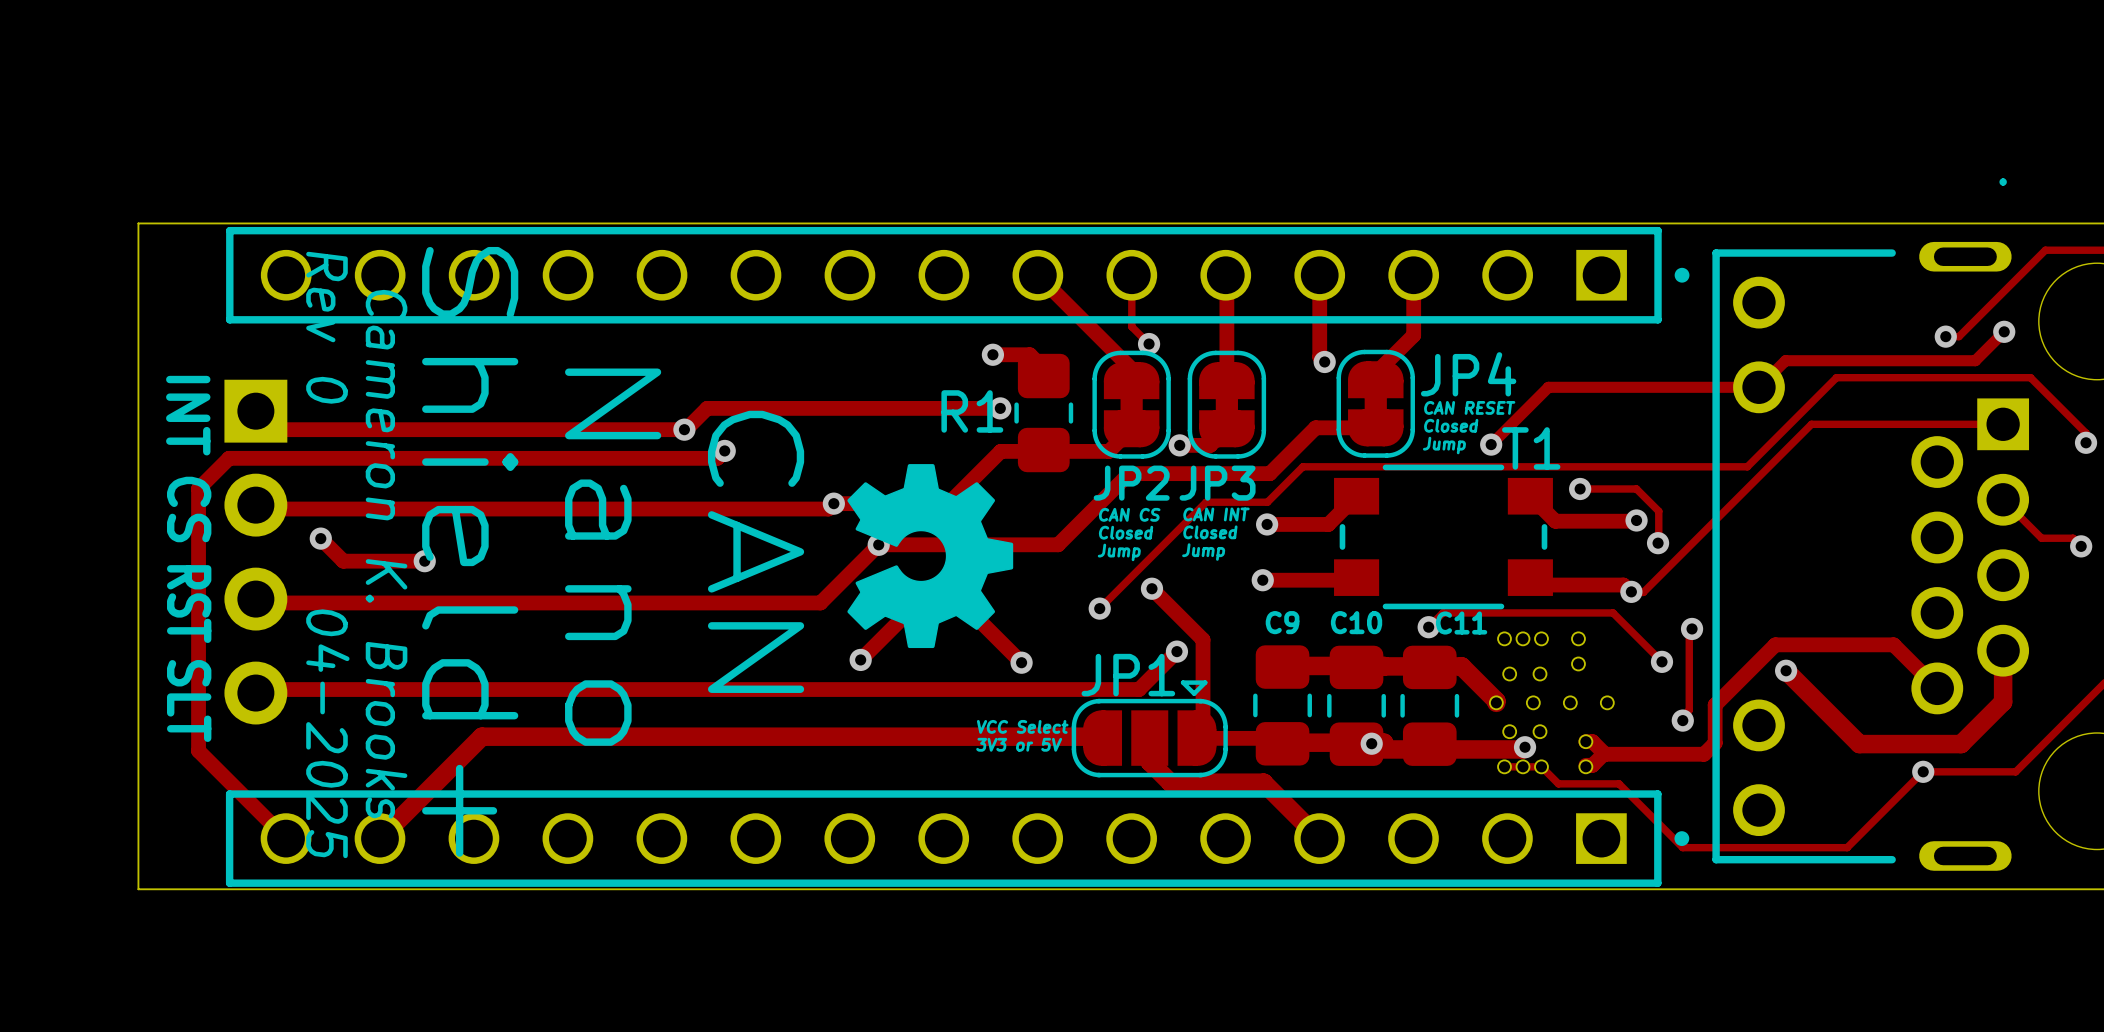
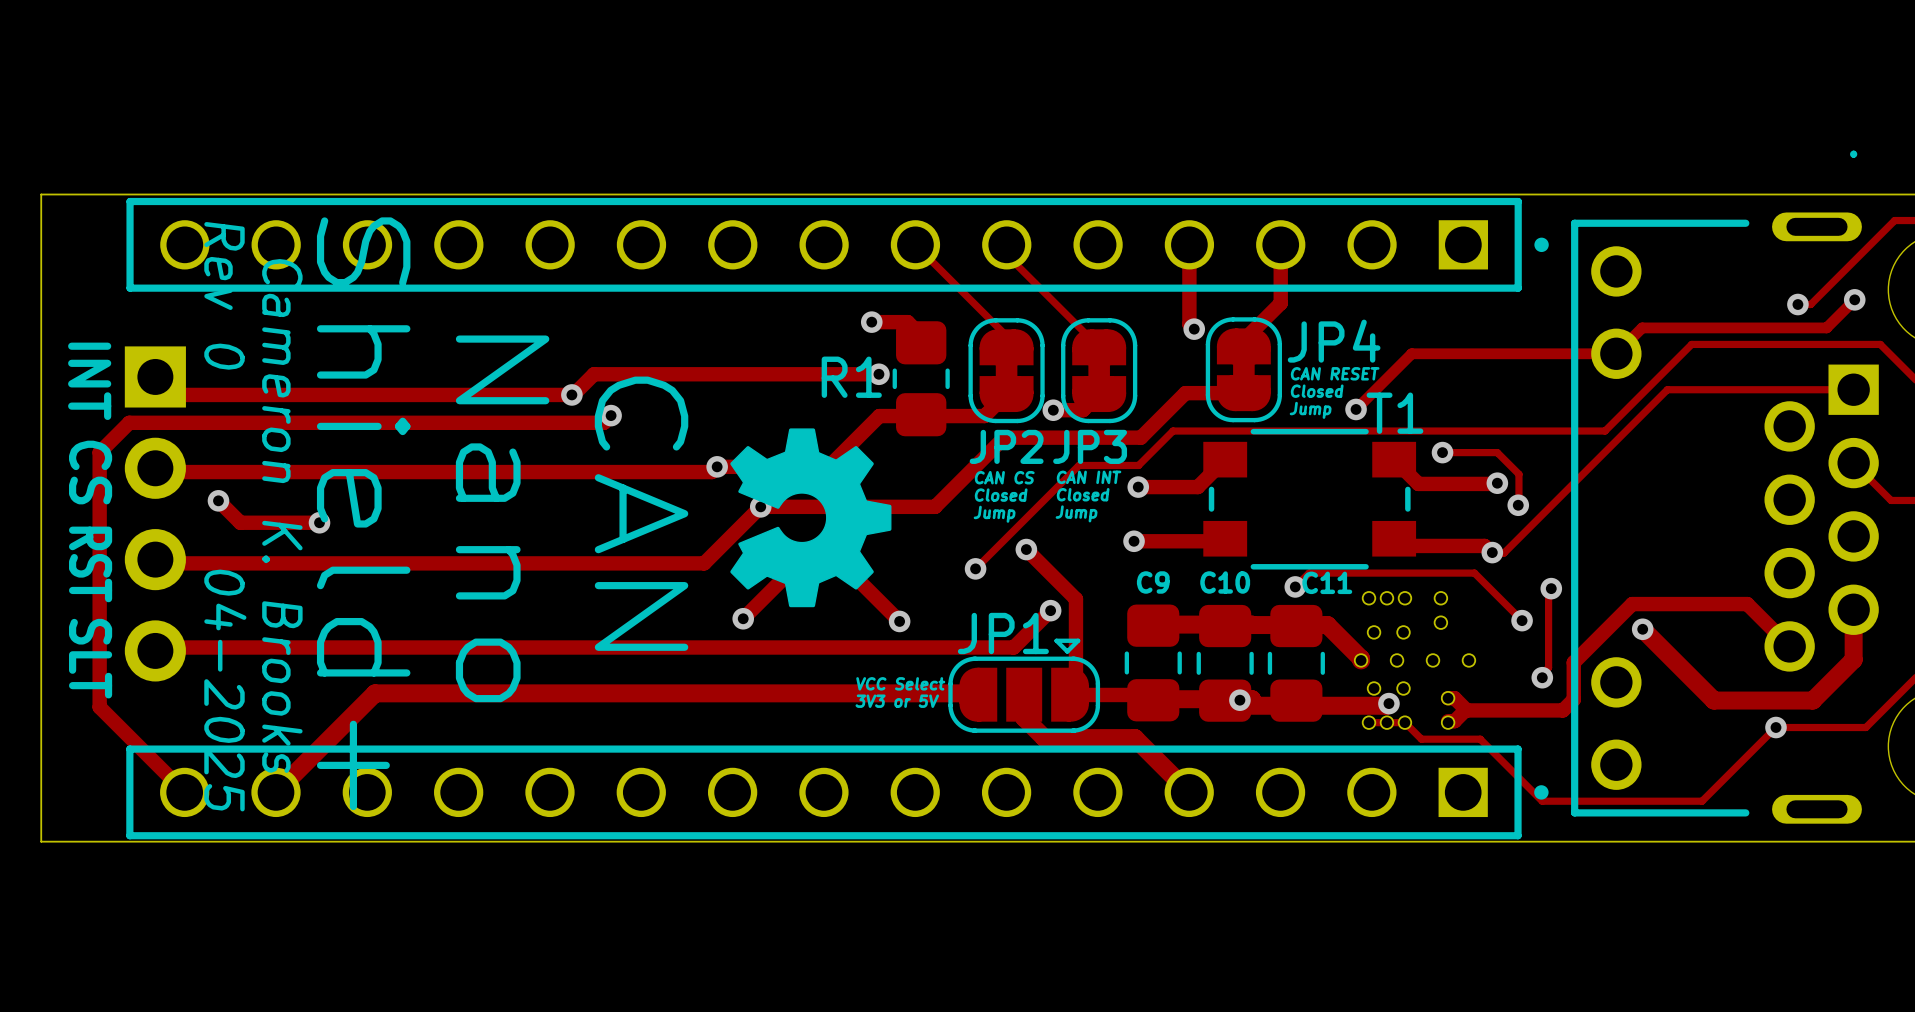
track width: thick (1037, 275) (1131, 369) (1131, 380) -> thin (915, 244) (1006, 335) (1006, 347)
track: (1226, 275) (1226, 371) -> none
track: (1131, 285) (1131, 326) (1149, 344) -> (1006, 254) (1099, 347)
via: (1149, 344) -> none

